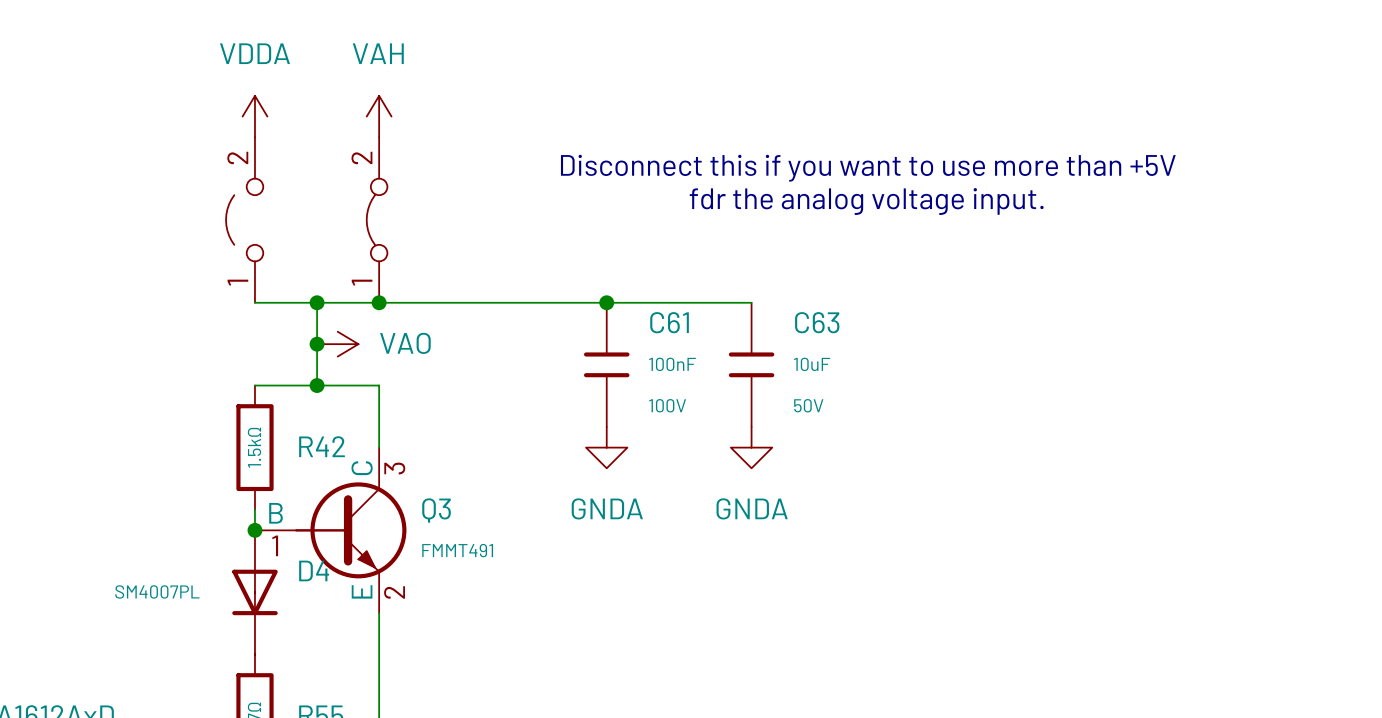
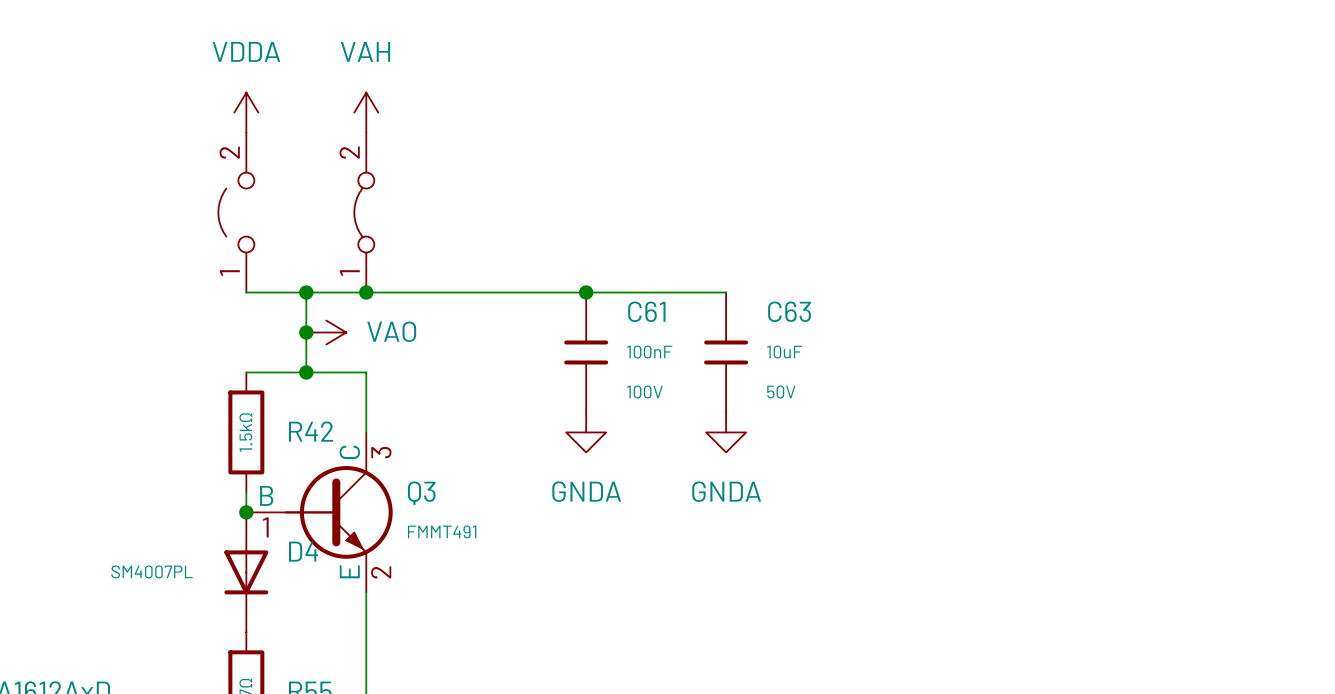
text: Disconnect this if you want to use more than +5V (868, 168) -> none
text: fdr the analog voltage input. (866, 201) -> none

